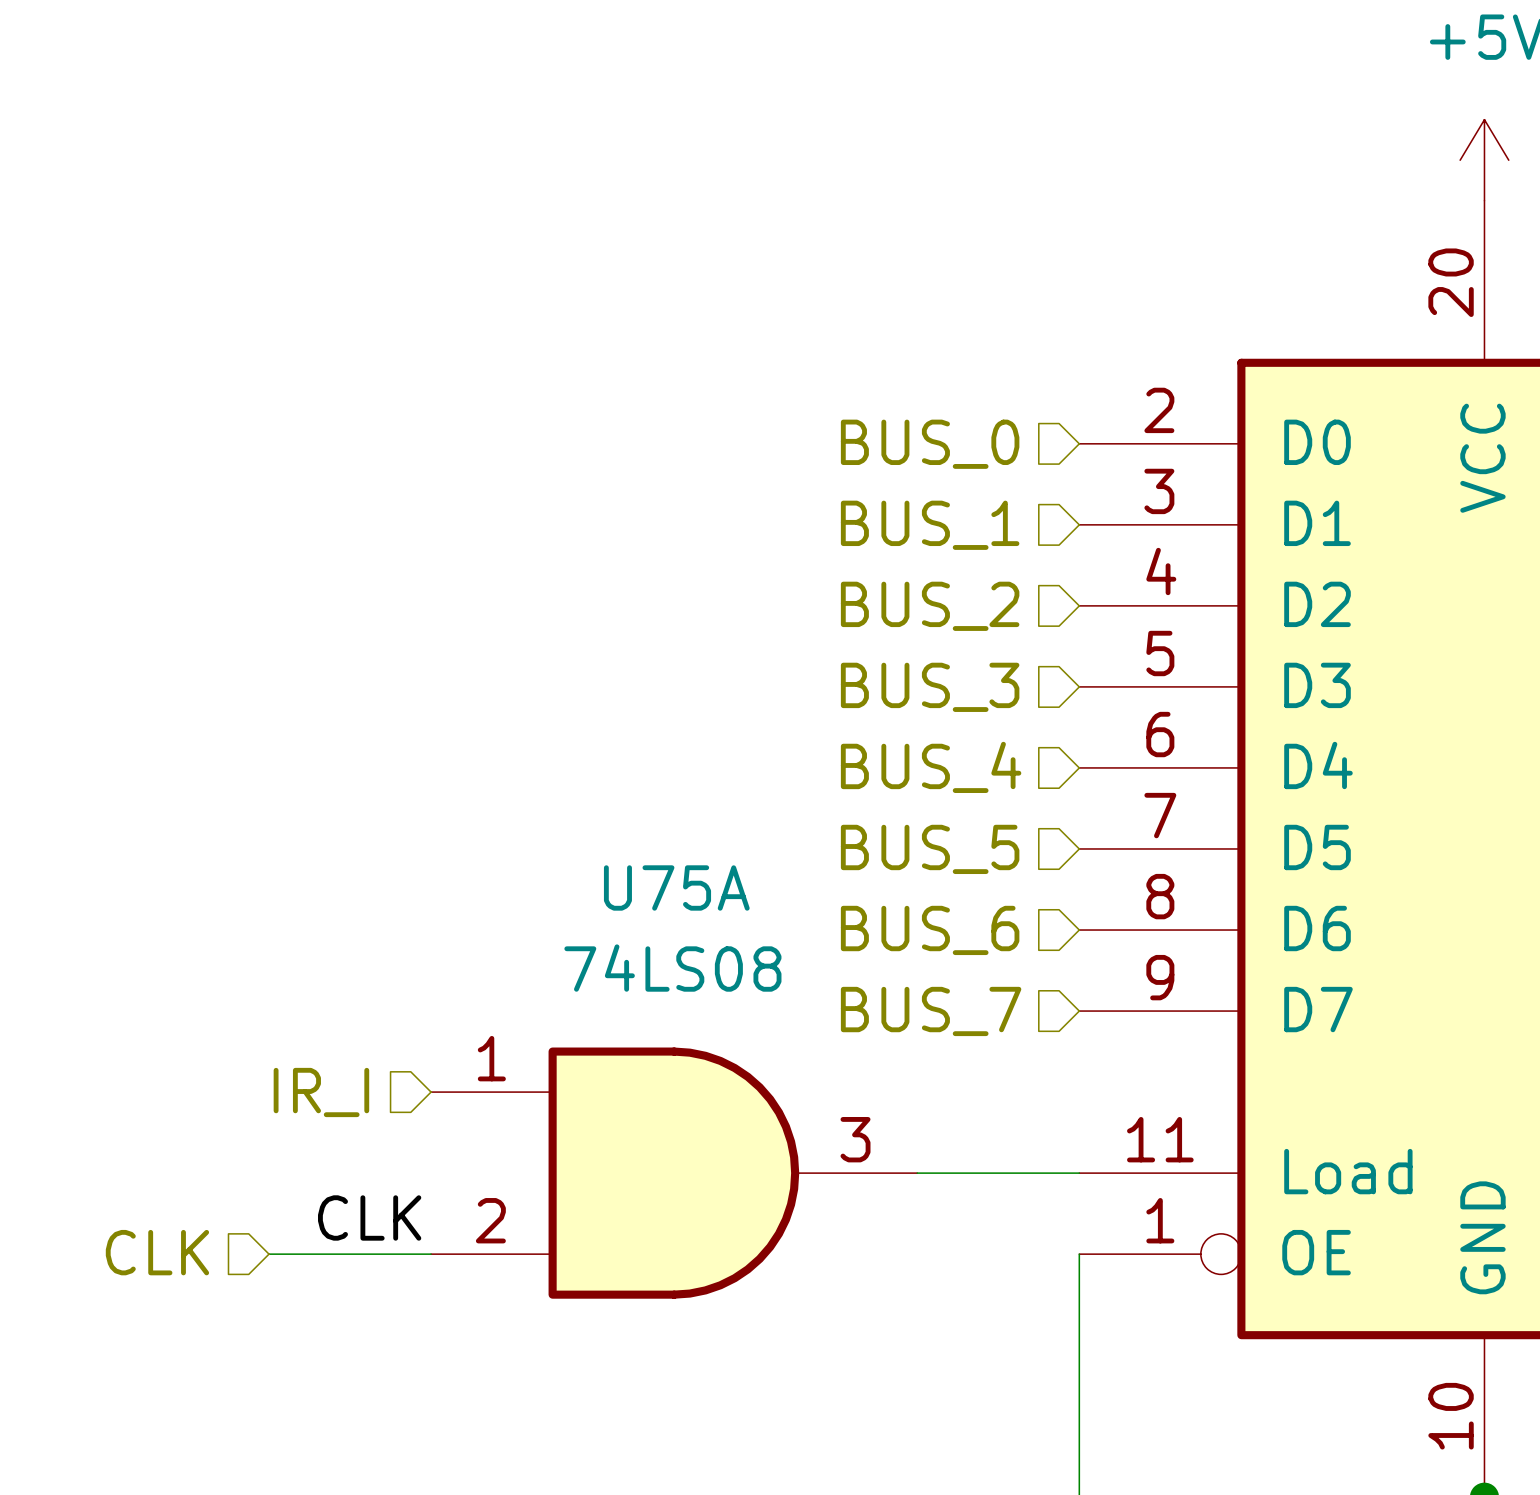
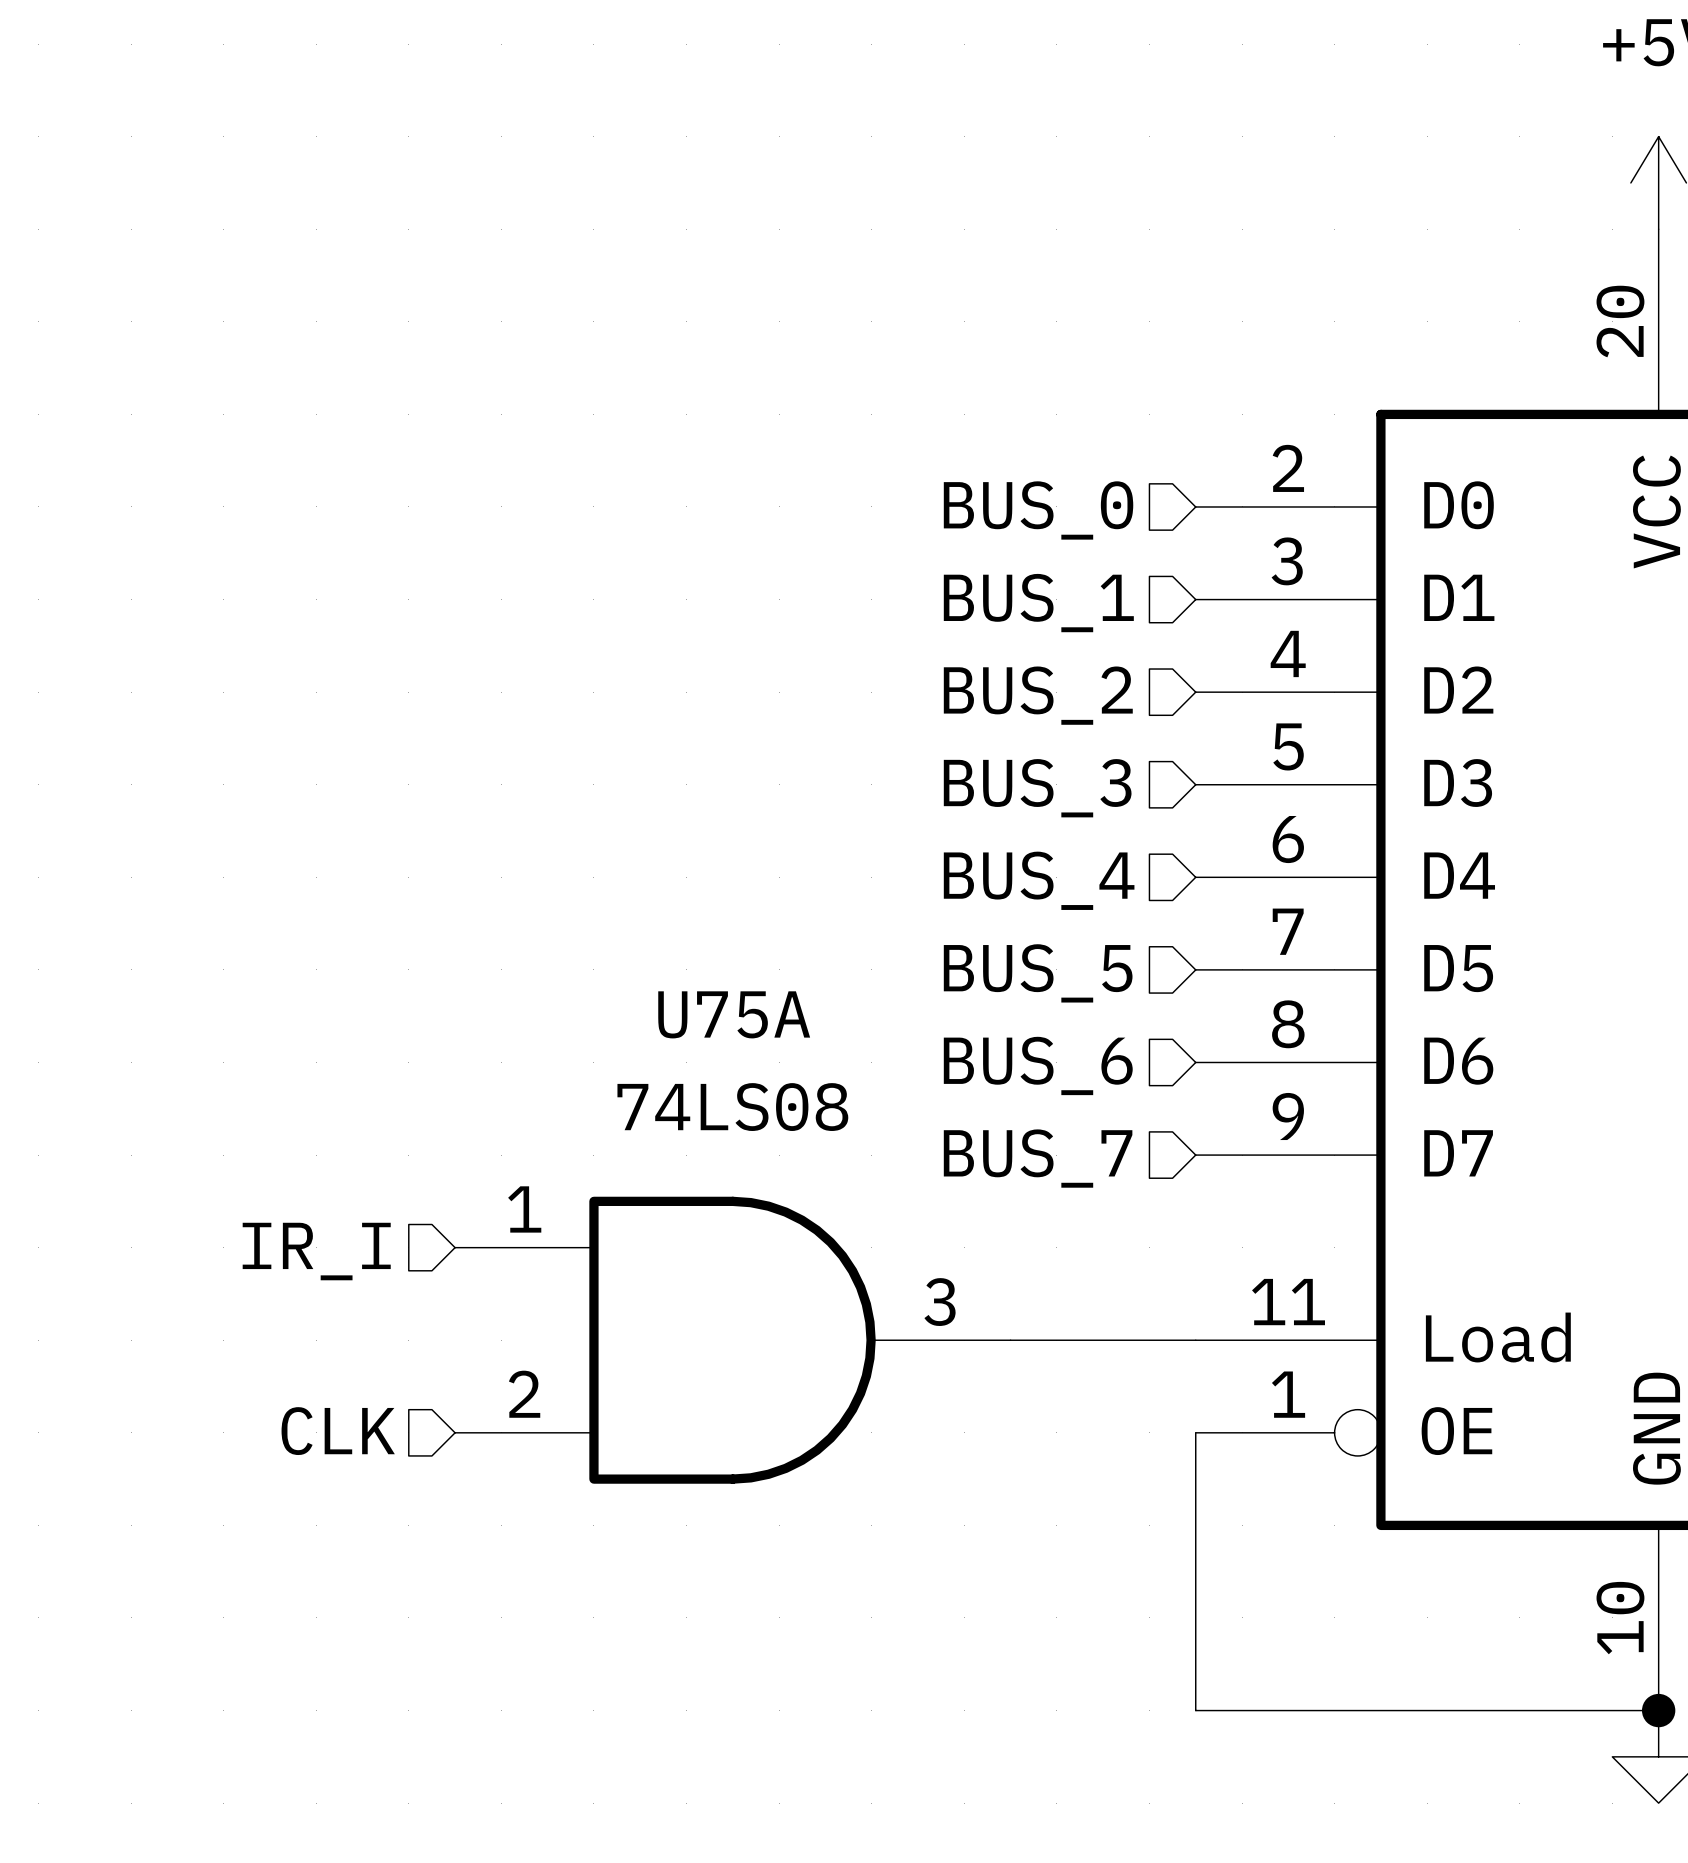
label: CLK (369, 1217) -> none
hierarchical label position: CLK (157, 1252) -> CLK (338, 1431)
wire: (269, 1254) (431, 1254) -> none

